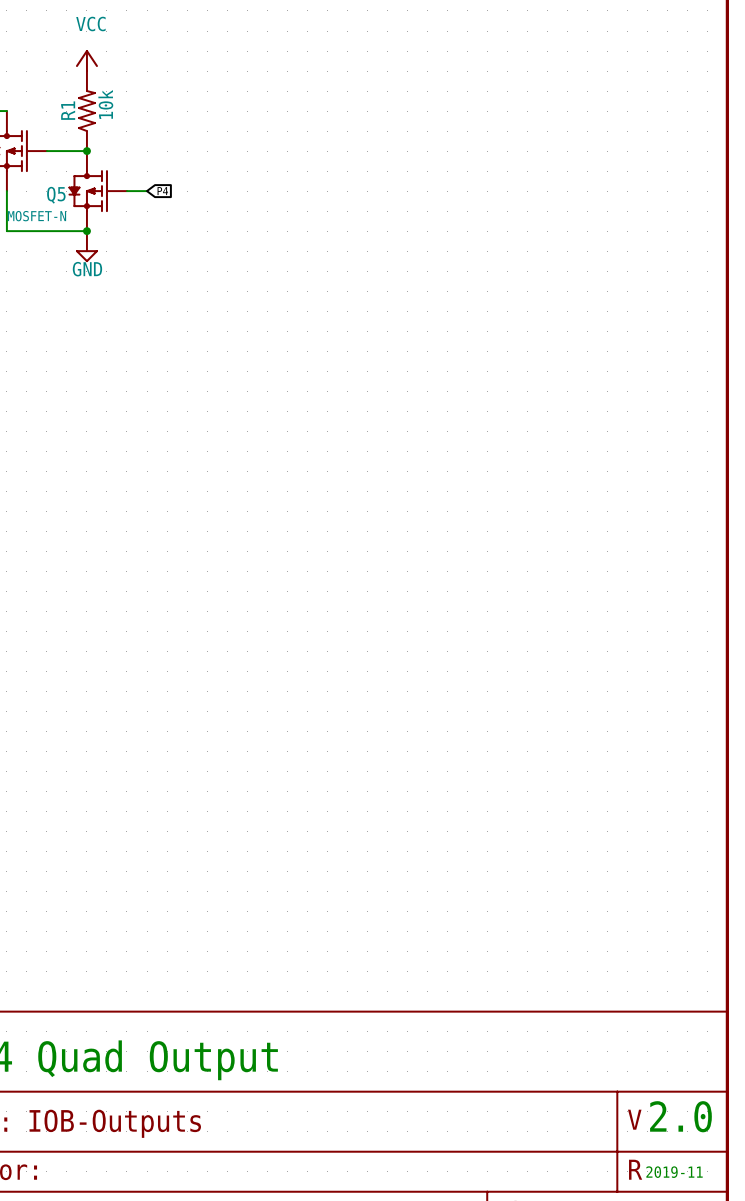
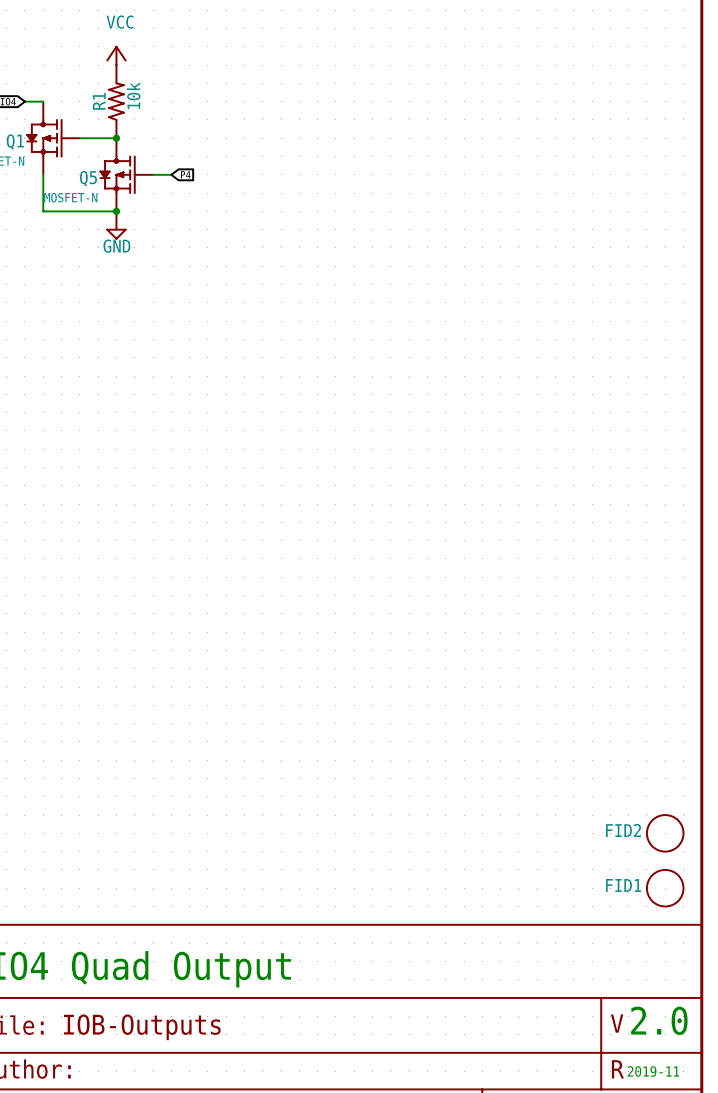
FID2: none -> (665, 833)
FID1: none -> (665, 888)

